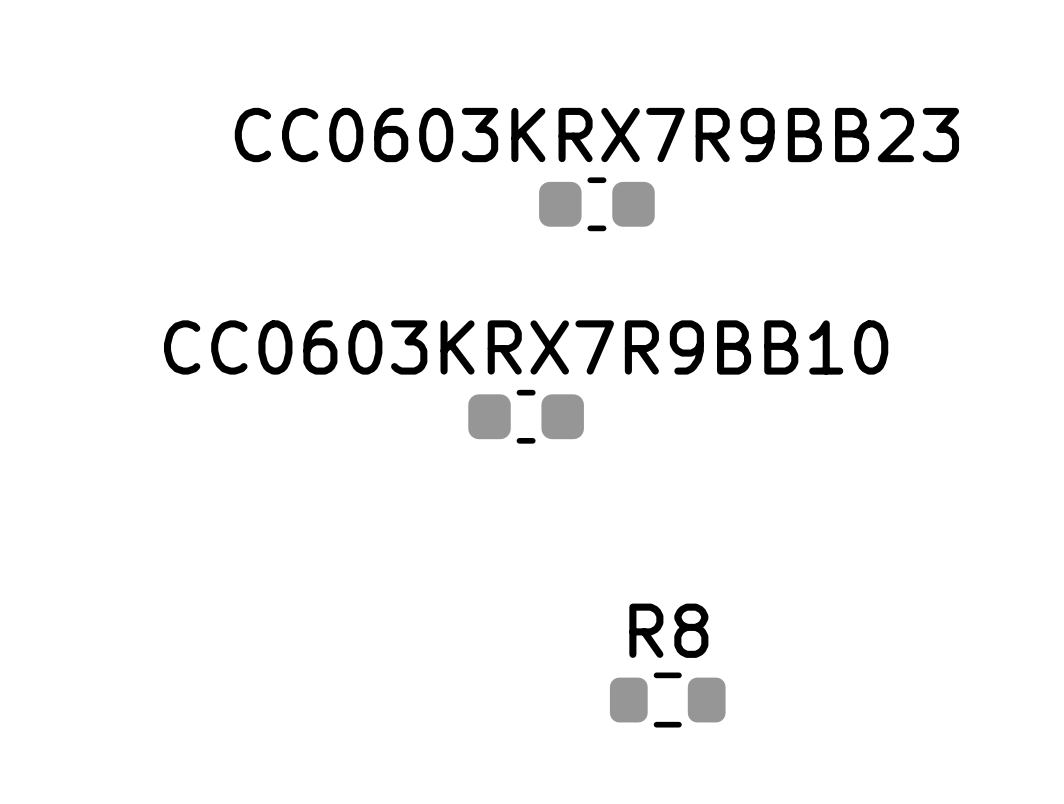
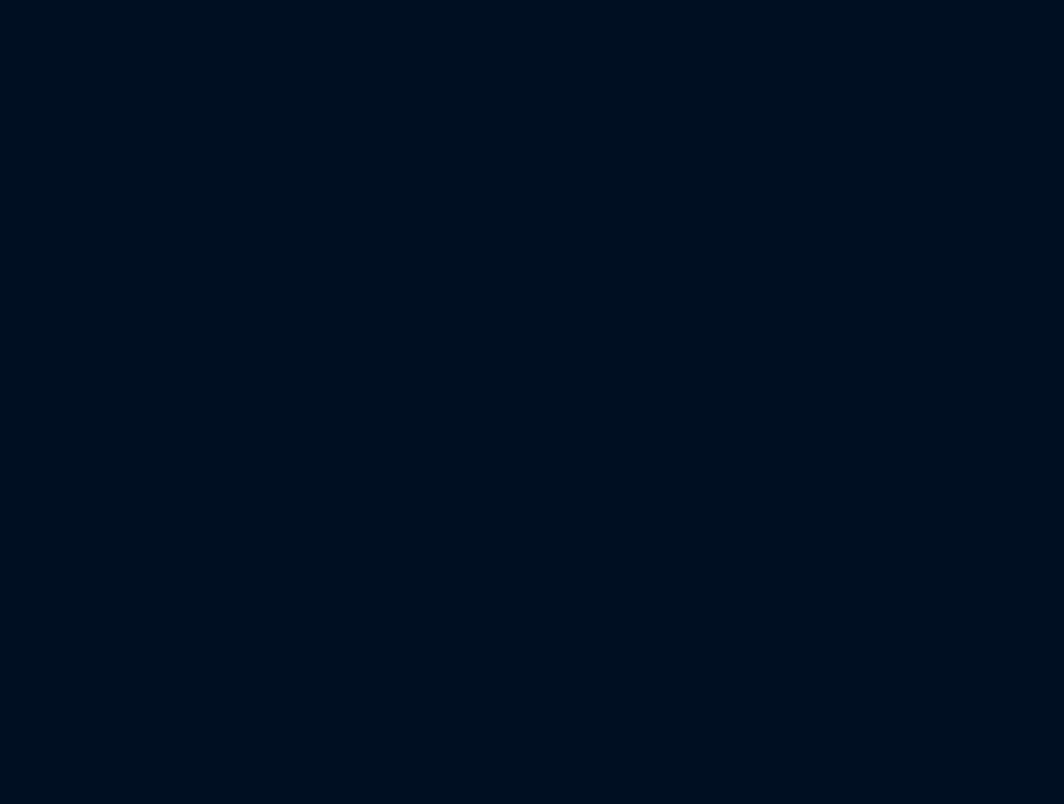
CC0603KRX7R9BB23: (596, 204) -> none
CC0603KRX7R9BB10: (526, 416) -> none
R8: (667, 700) -> none

